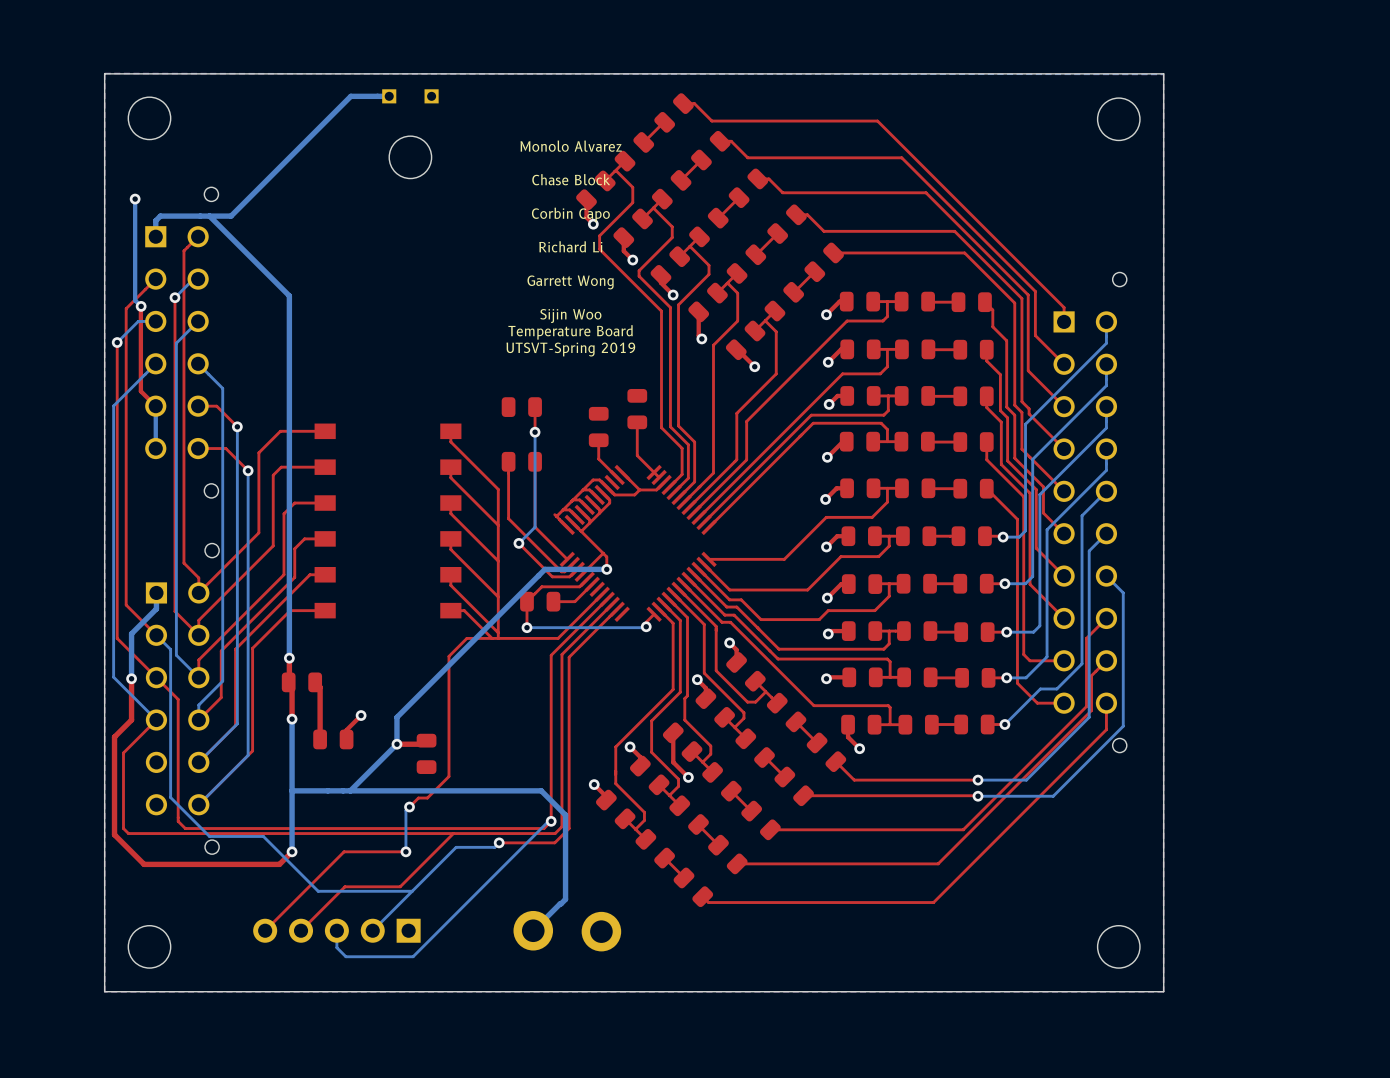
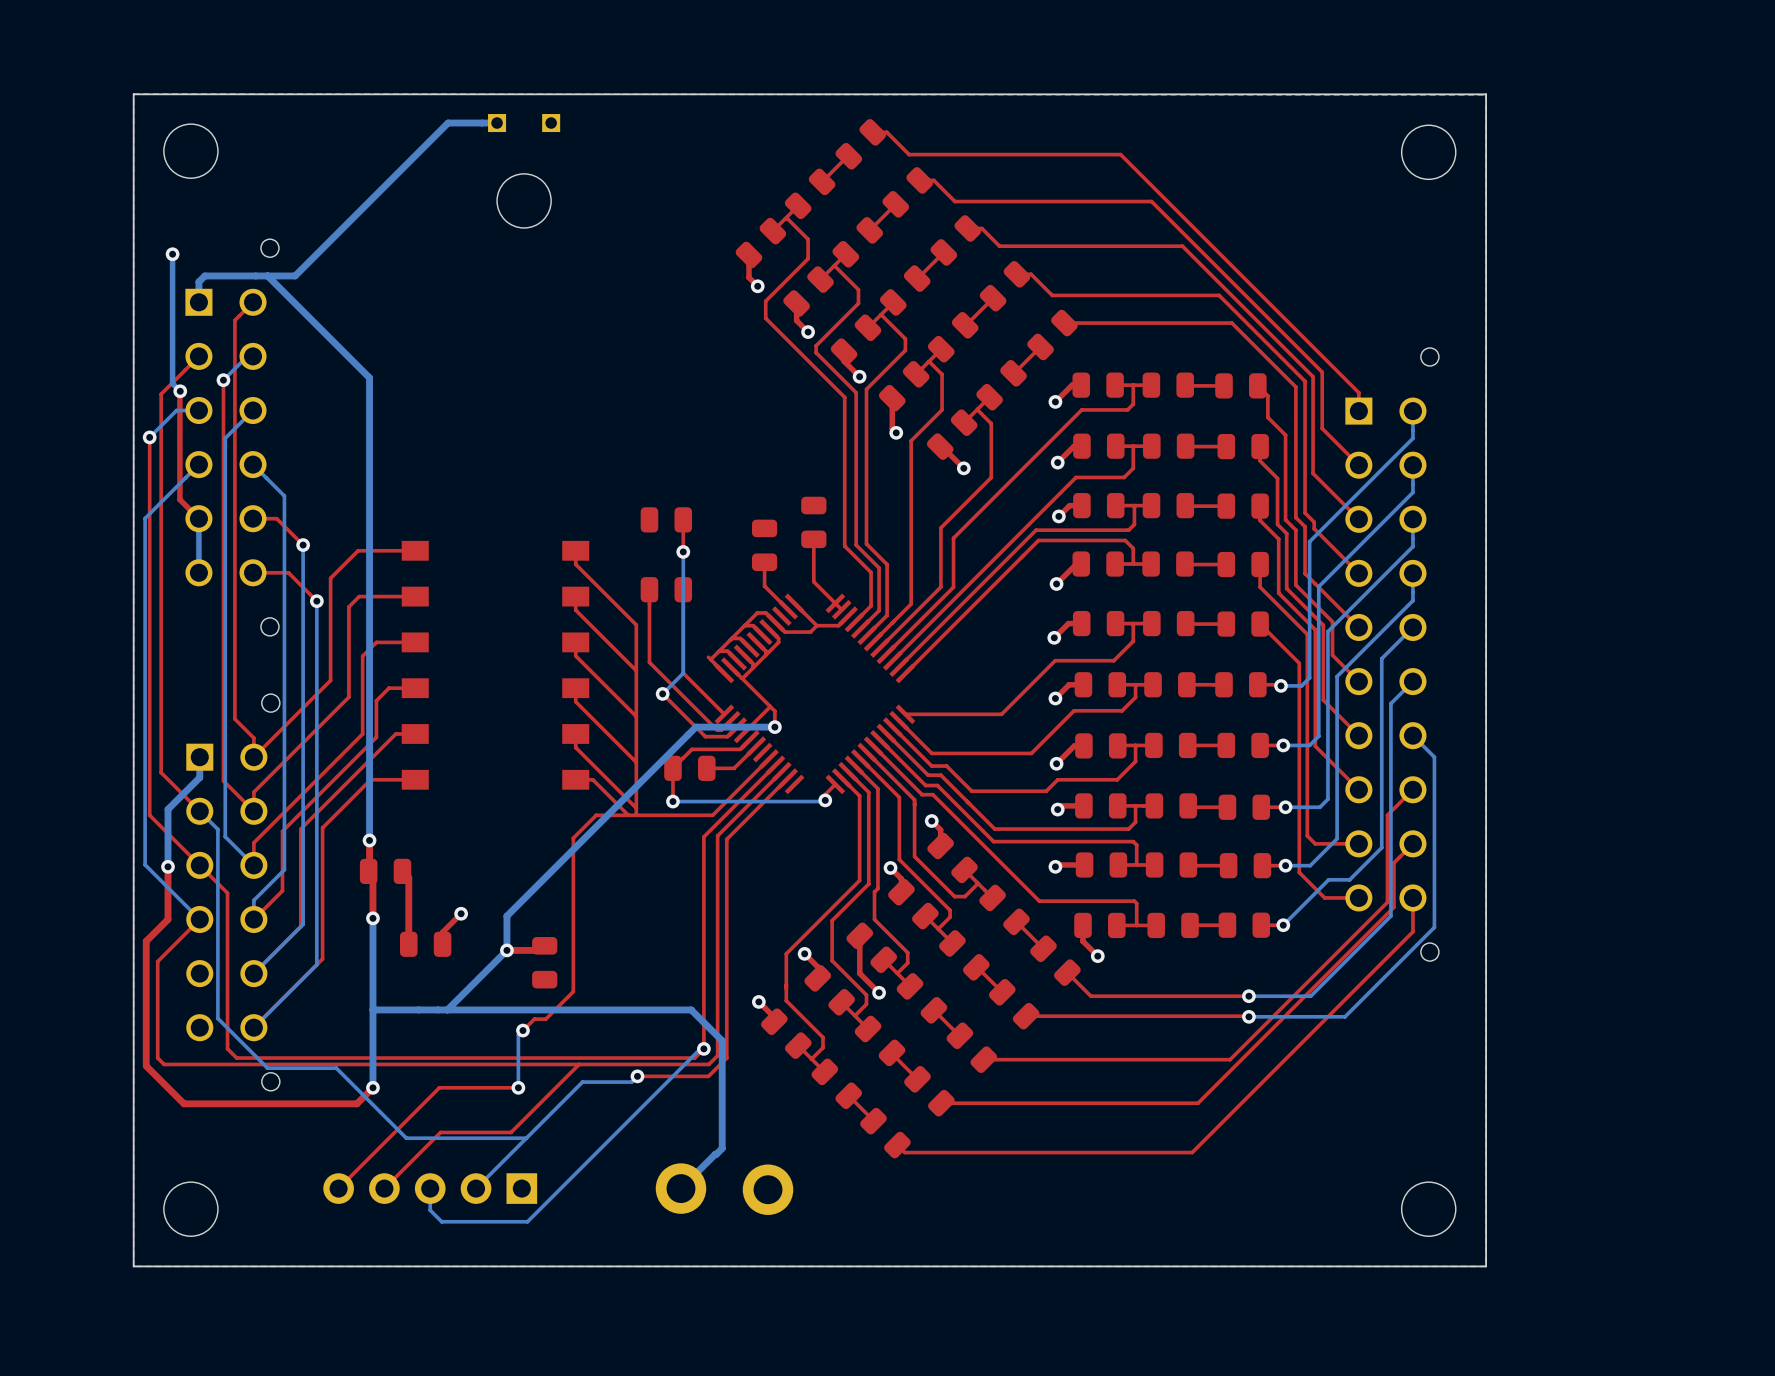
text: Monolo Alvarez (571, 146) -> none
text: Chase Block (571, 179) -> none
text: Corbin Capo (570, 214) -> none
text: Richard Li (570, 246) -> none
text: Garrett Wong (570, 282) -> none
text: Sijin Woo (570, 315) -> none
text: Temperature Board (570, 332) -> none
text: UTSVT-Spring 2019 (570, 349) -> none

